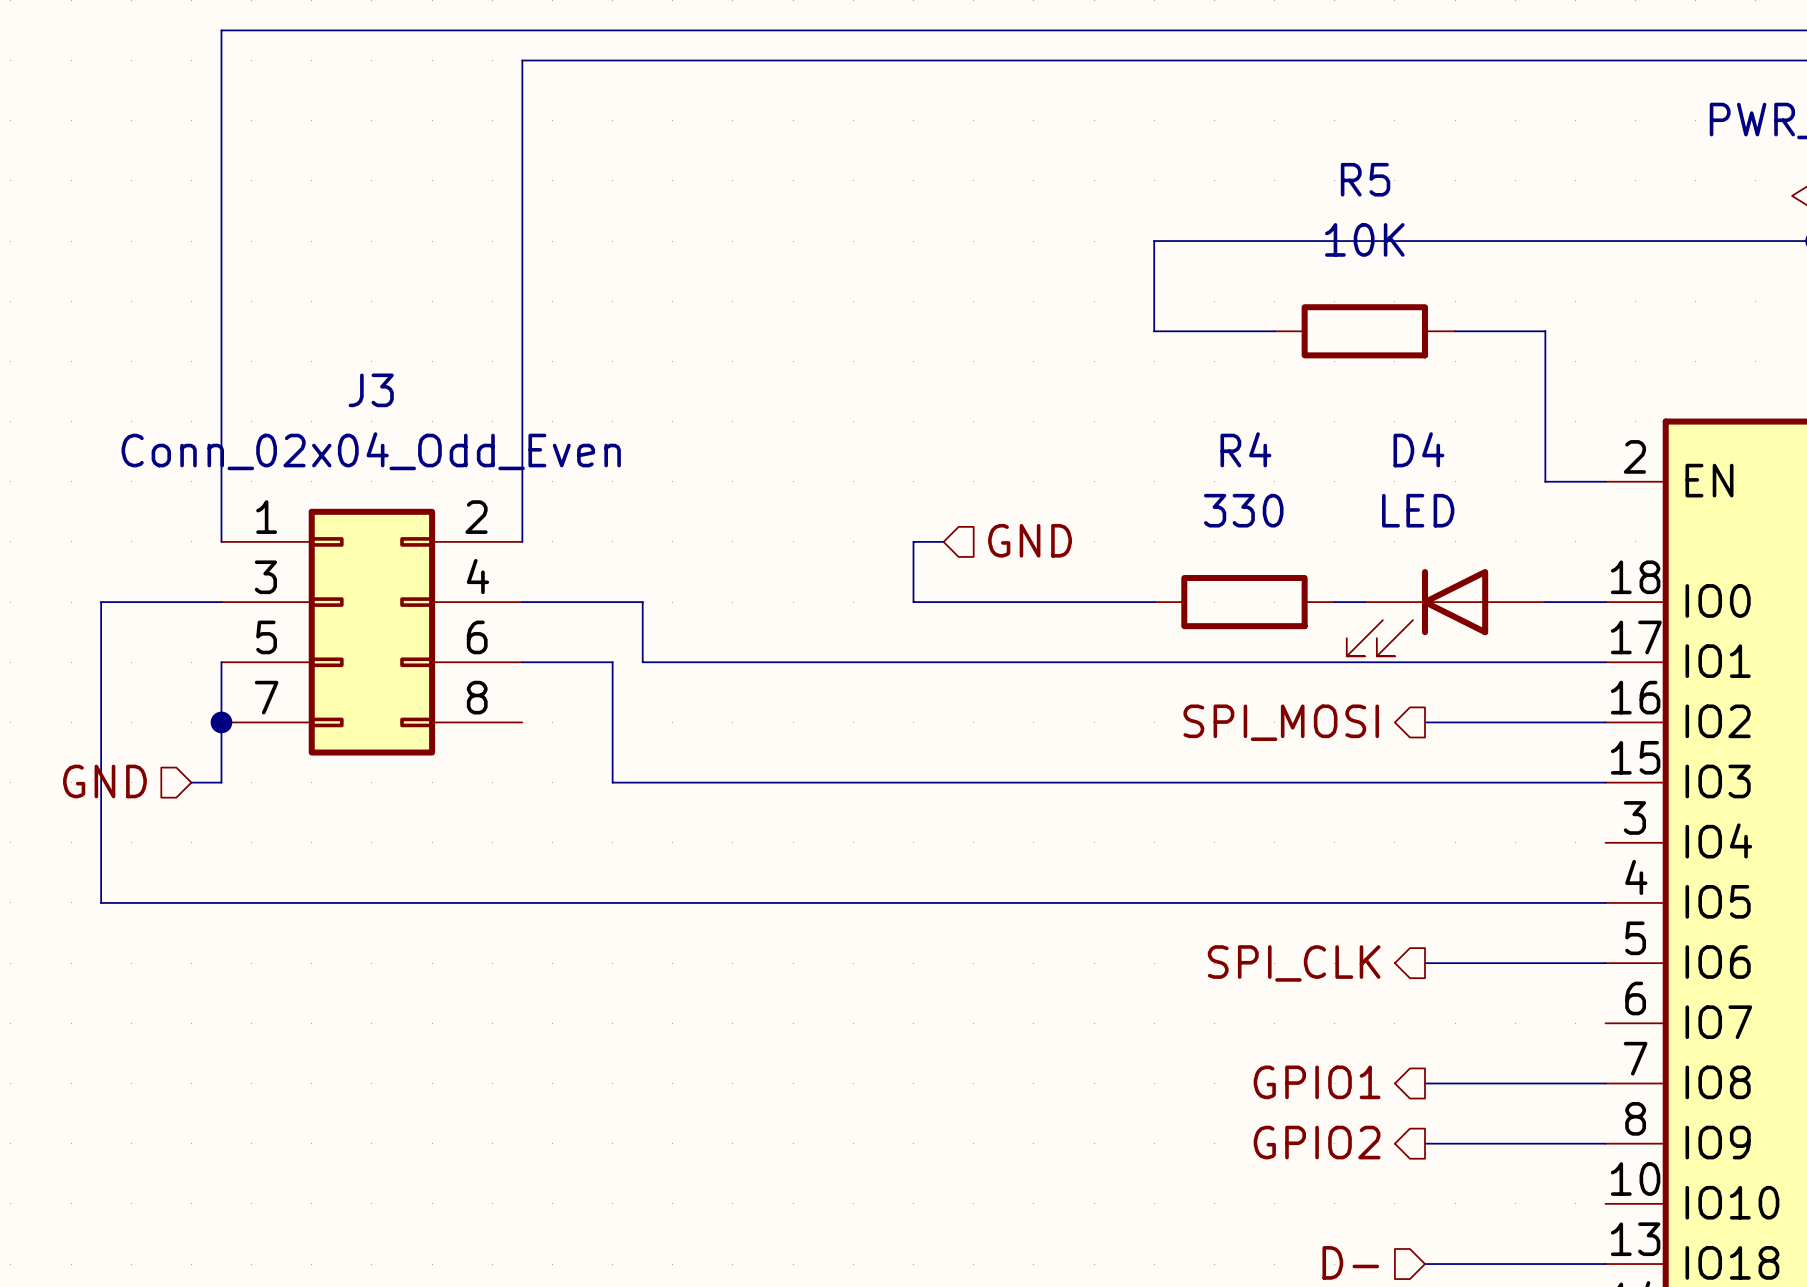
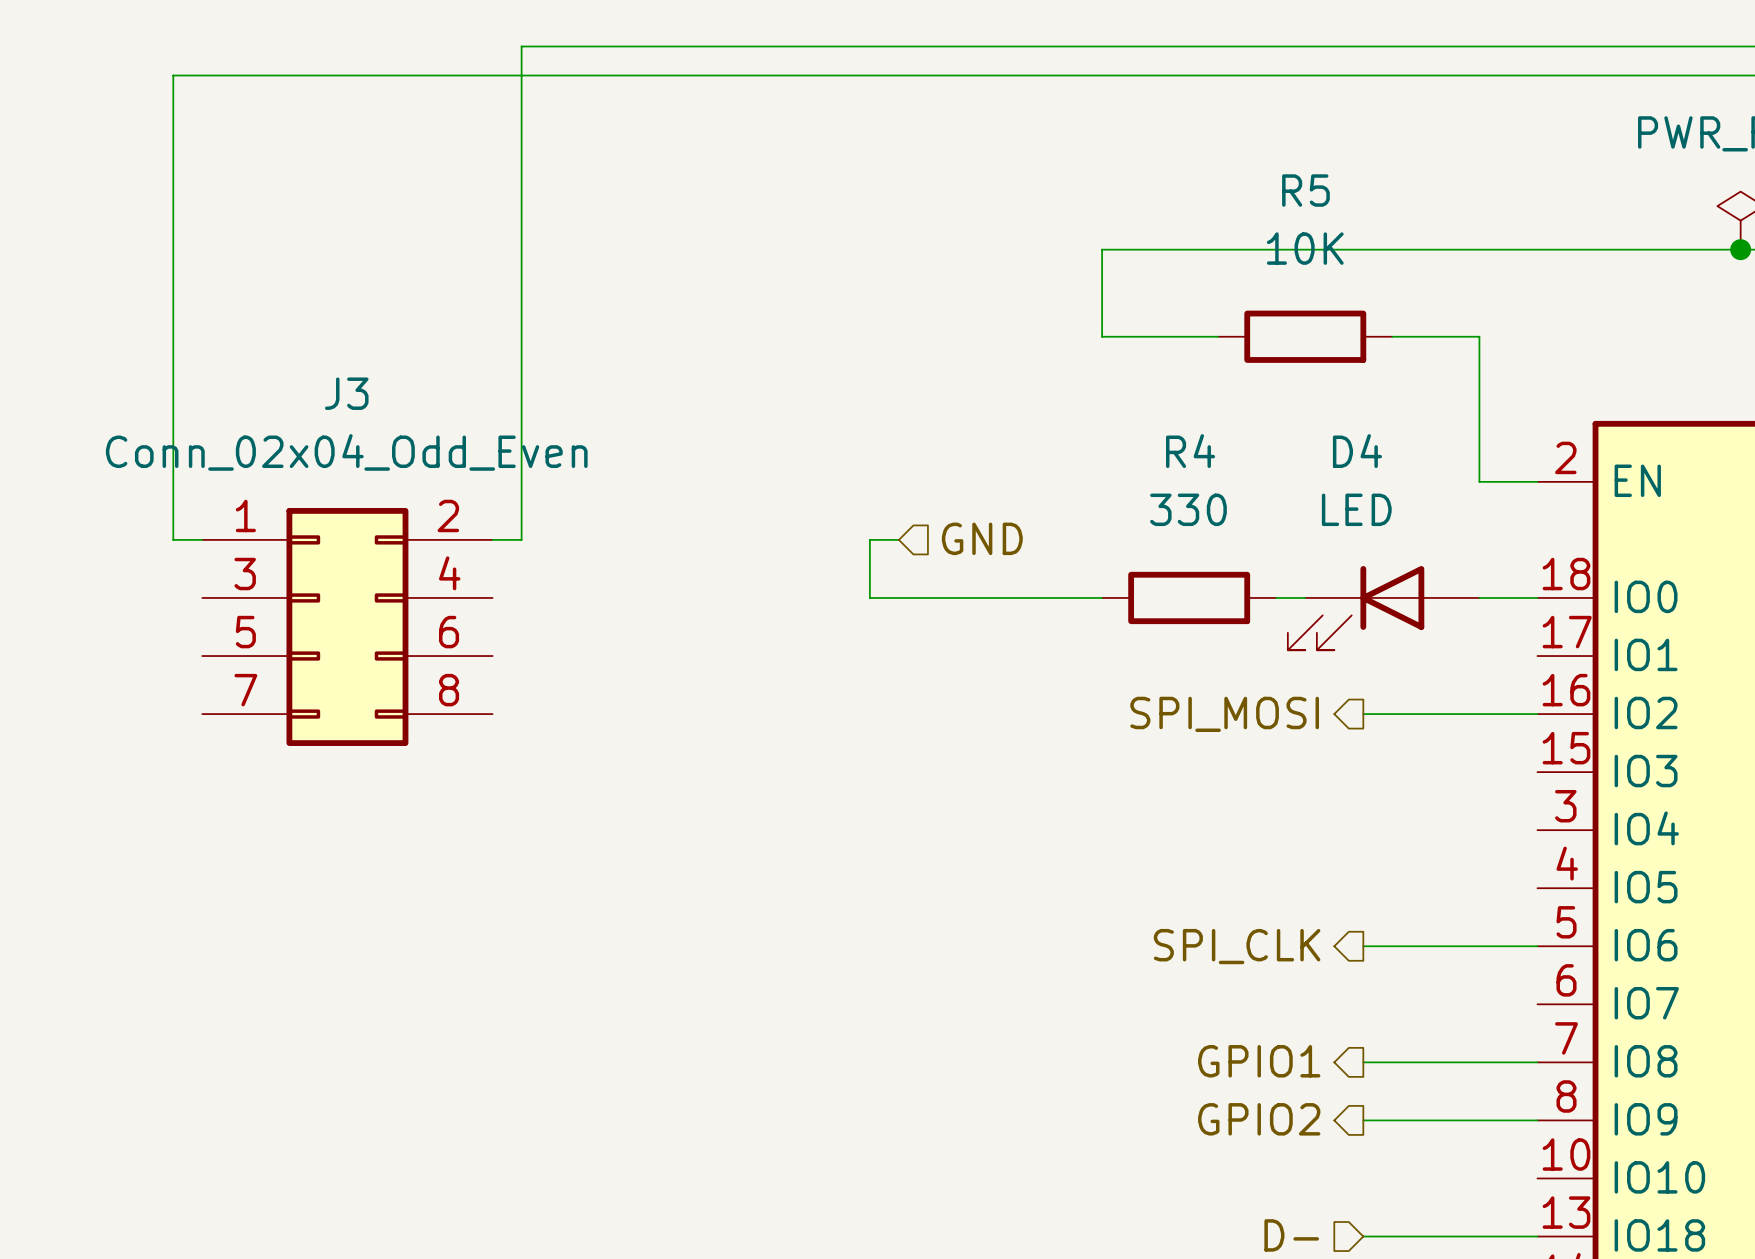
wire: (552, 30) (221, 30) (221, 541) -> (492, 75) (173, 75) (173, 539) (202, 539)
wire: (522, 60) (522, 541) -> (521, 46) (521, 539) (492, 539)
wire: (221, 602) (101, 602) (101, 902) (1605, 902) -> none
wire: (522, 602) (642, 602) (642, 662) (1605, 662) -> none
wire: (221, 662) (221, 782) (191, 782) -> none
wire: (522, 662) (612, 662) (612, 782) (1605, 782) -> none
junction: (221, 722) -> none
hierarchical label: GND (104, 781) -> none

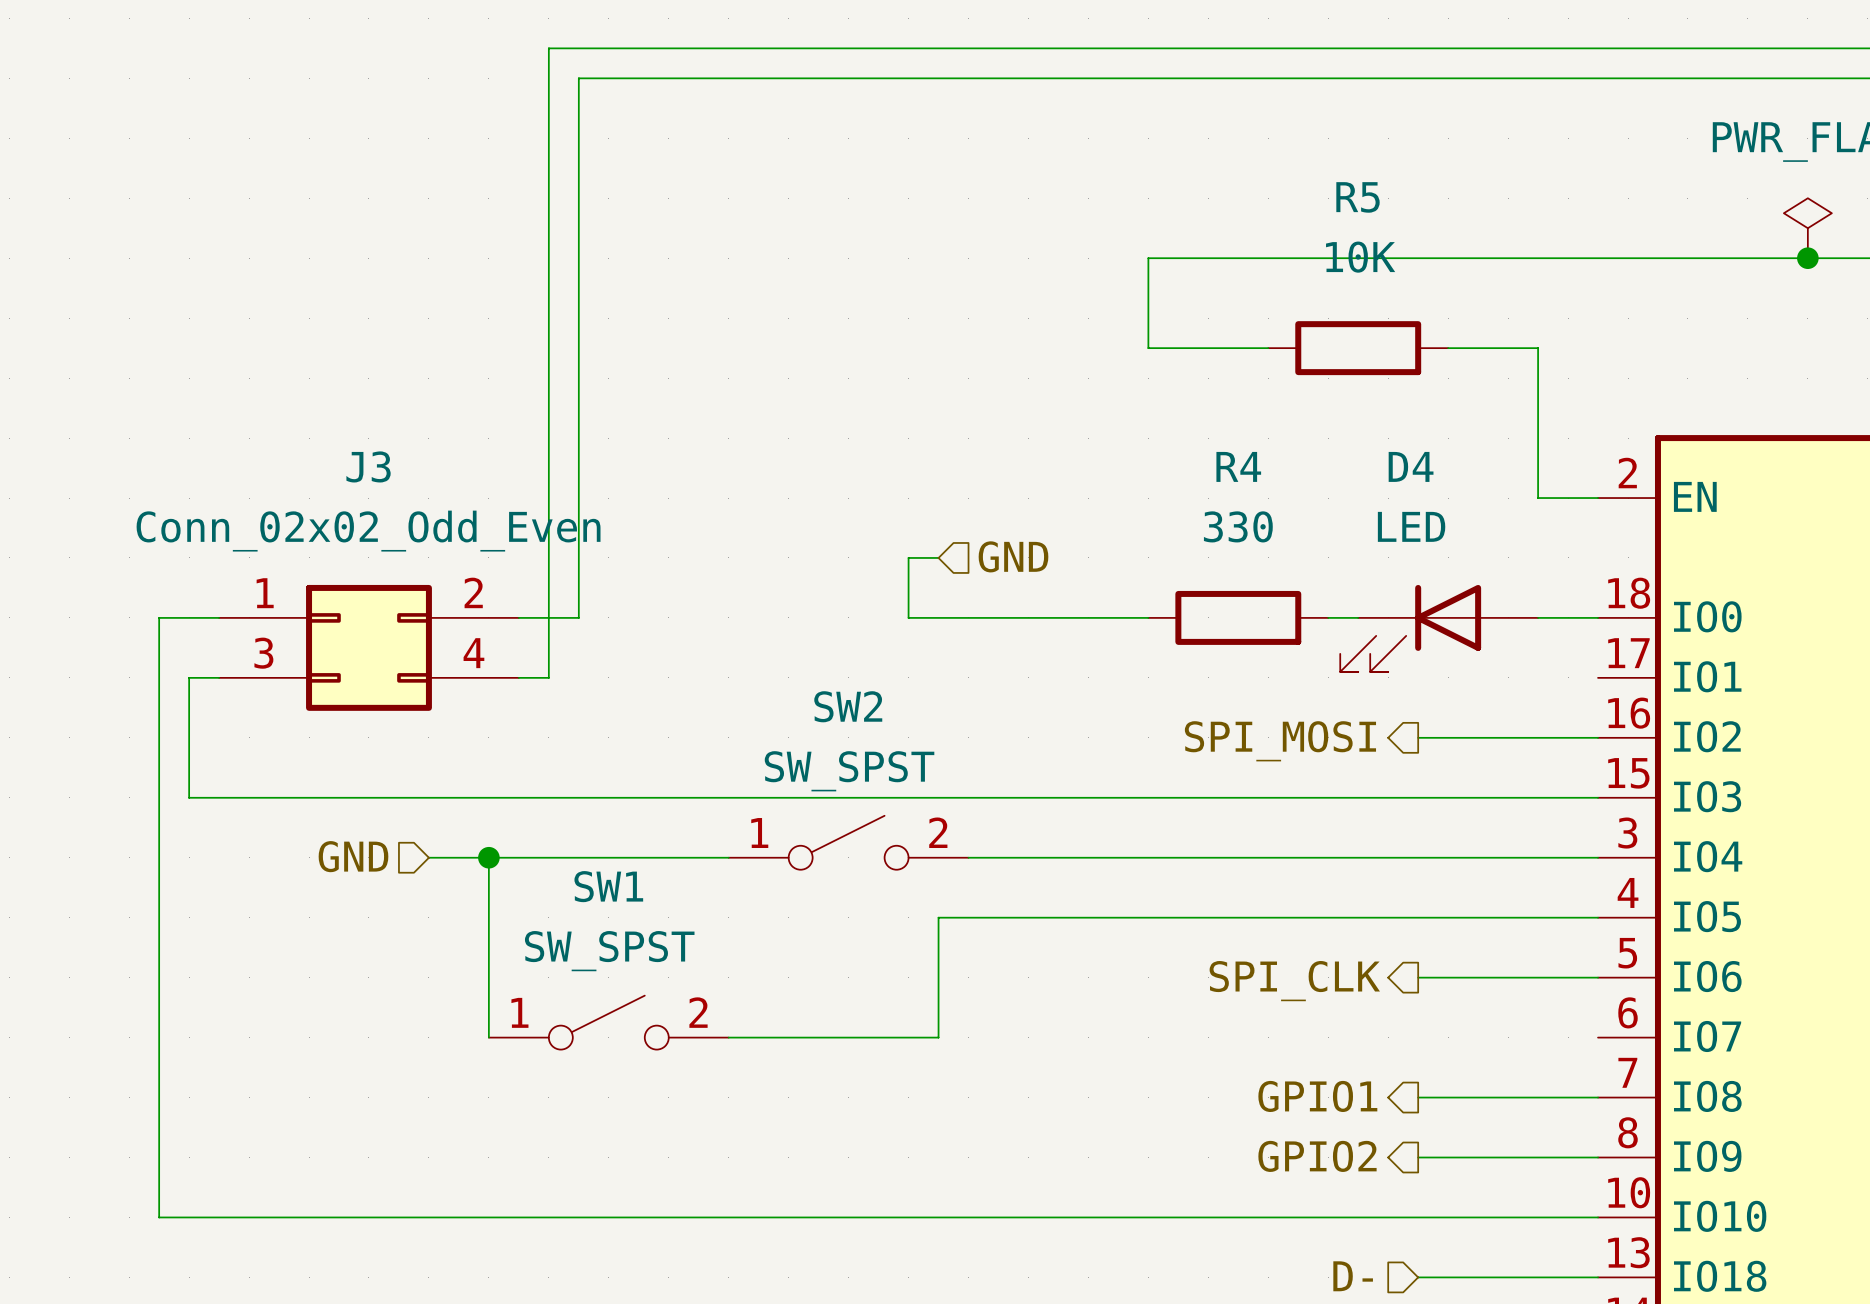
wire: (550, 75) (173, 75) (173, 539) (202, 539) -> (578, 78) (578, 617) (518, 617)
J3 name position: J3 (346, 393) -> J3 (368, 466)
J3 value: Conn_02x04_Odd_Even (346, 452) -> Conn_02x02_Odd_Even (368, 531)
J3 symbol: [202, 507, 493, 746] -> [219, 584, 519, 711]
wire: (492, 539) (521, 539) -> (518, 677) (548, 677) (548, 557)
wire: none -> (219, 617) (159, 617) (159, 1217) (1598, 1217)
wire: none -> (219, 677) (189, 677) (189, 797) (1598, 797)
SW2: none -> SW_SPST (848, 842)
hierarchical label: none -> GND (353, 856)
wire: none -> (428, 857) (728, 857)
wire: none -> (488, 857) (488, 1037)
junction: none -> (488, 857)
wire: none -> (968, 857) (1598, 857)
wire: none -> (1598, 917) (938, 917) (938, 1037) (728, 1037)
SW1: none -> SW_SPST (608, 1022)

